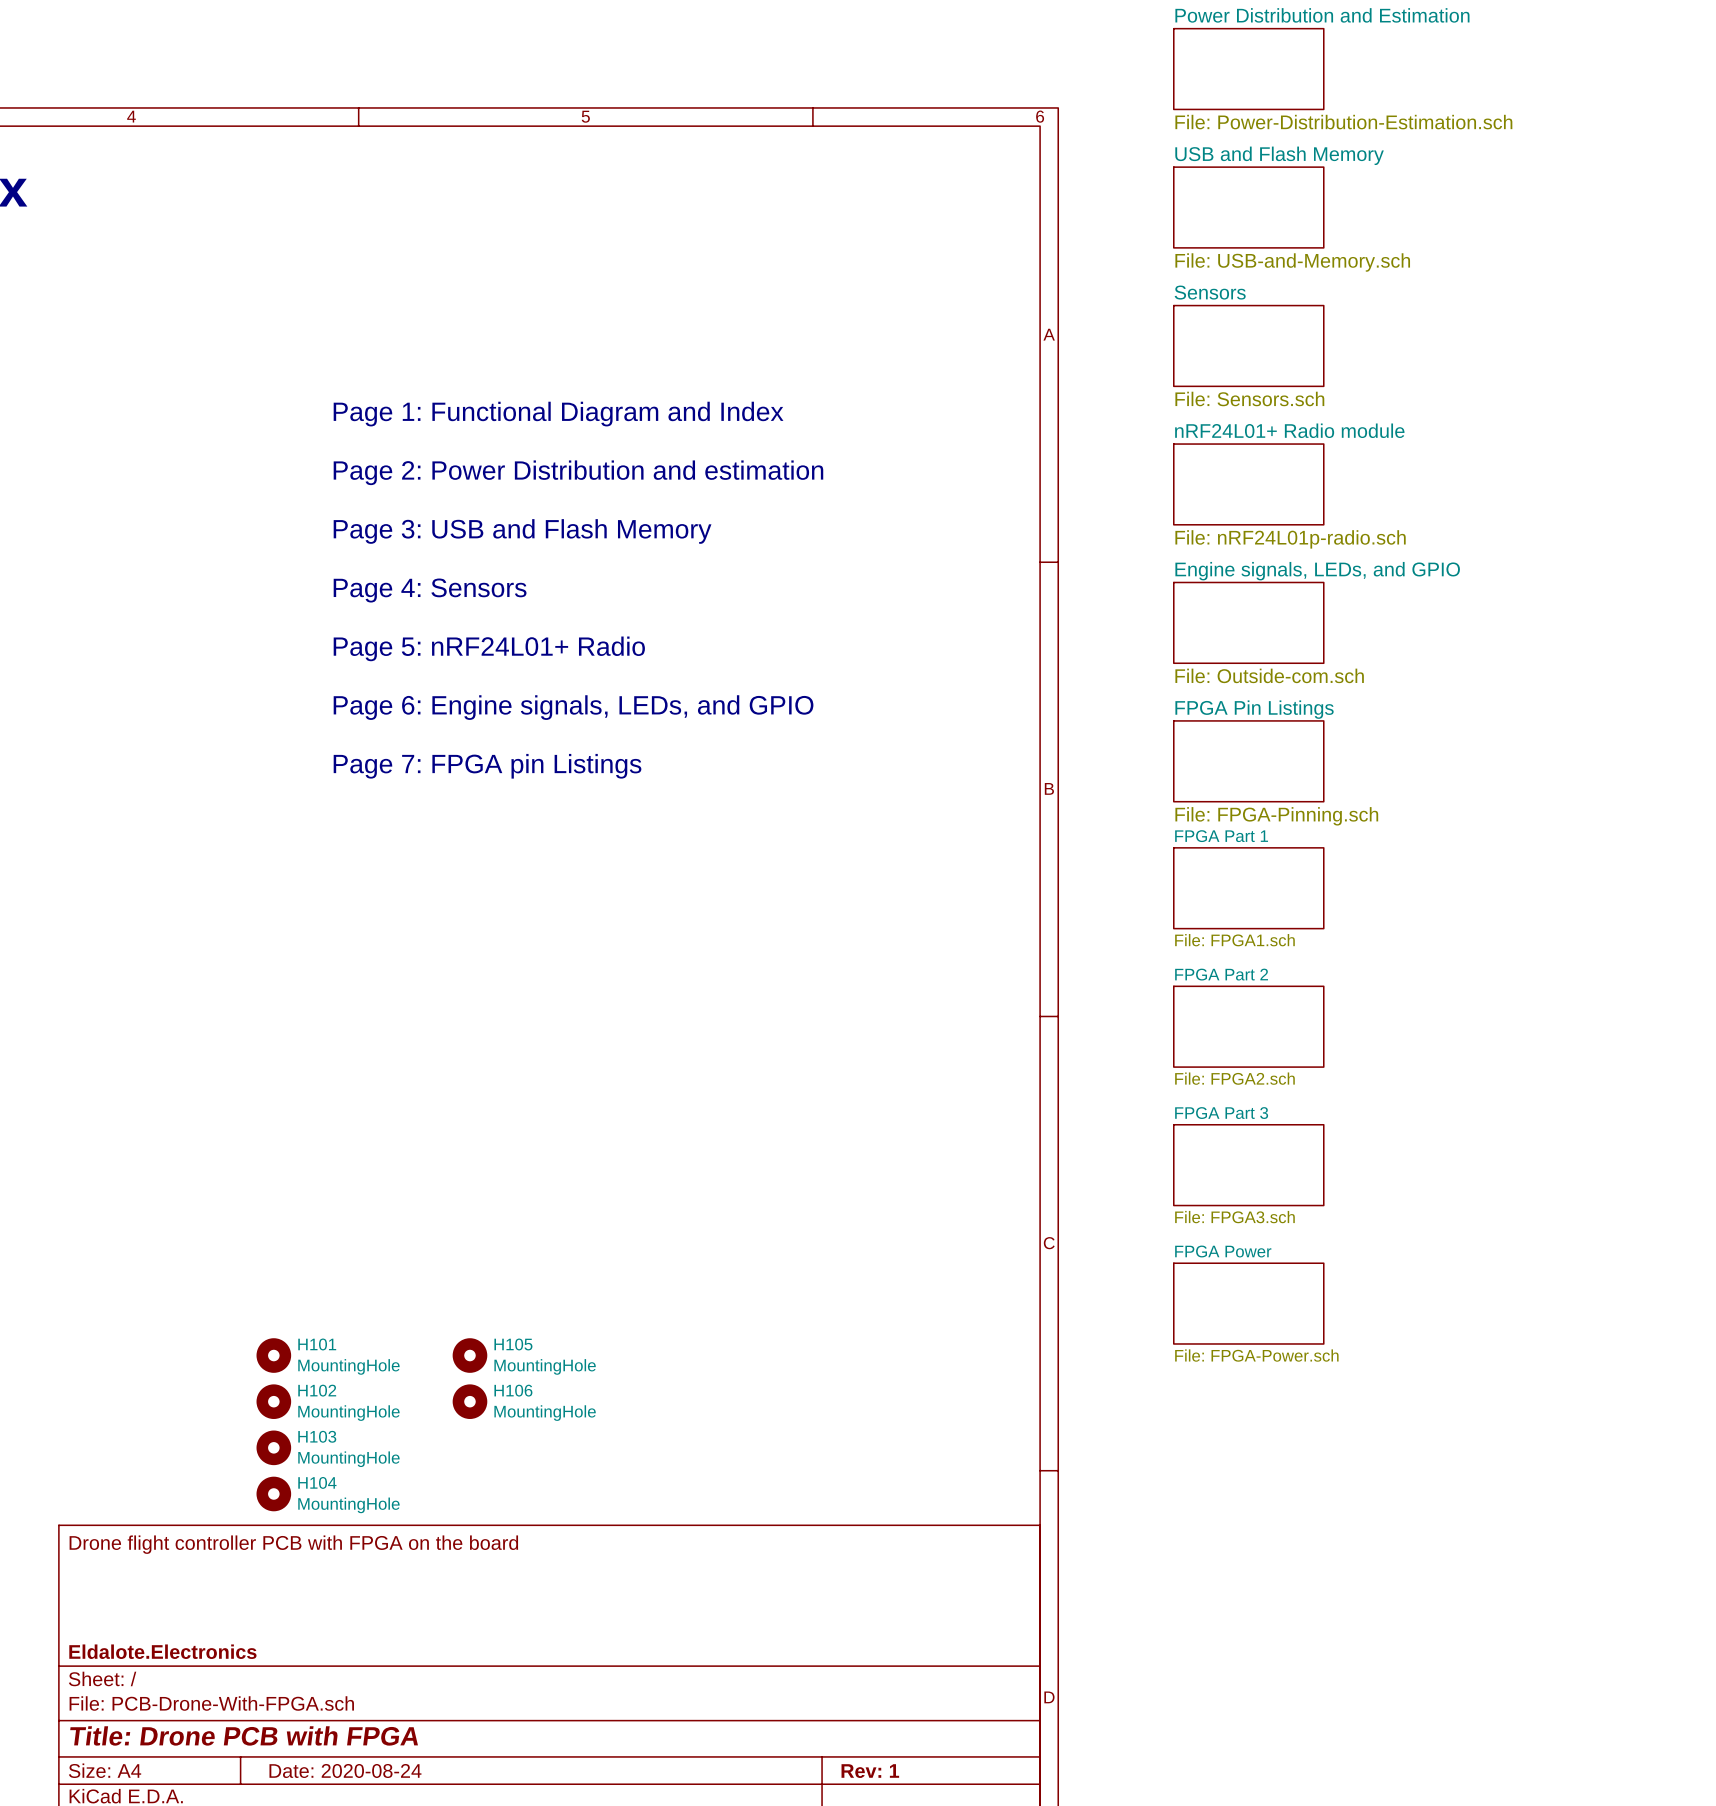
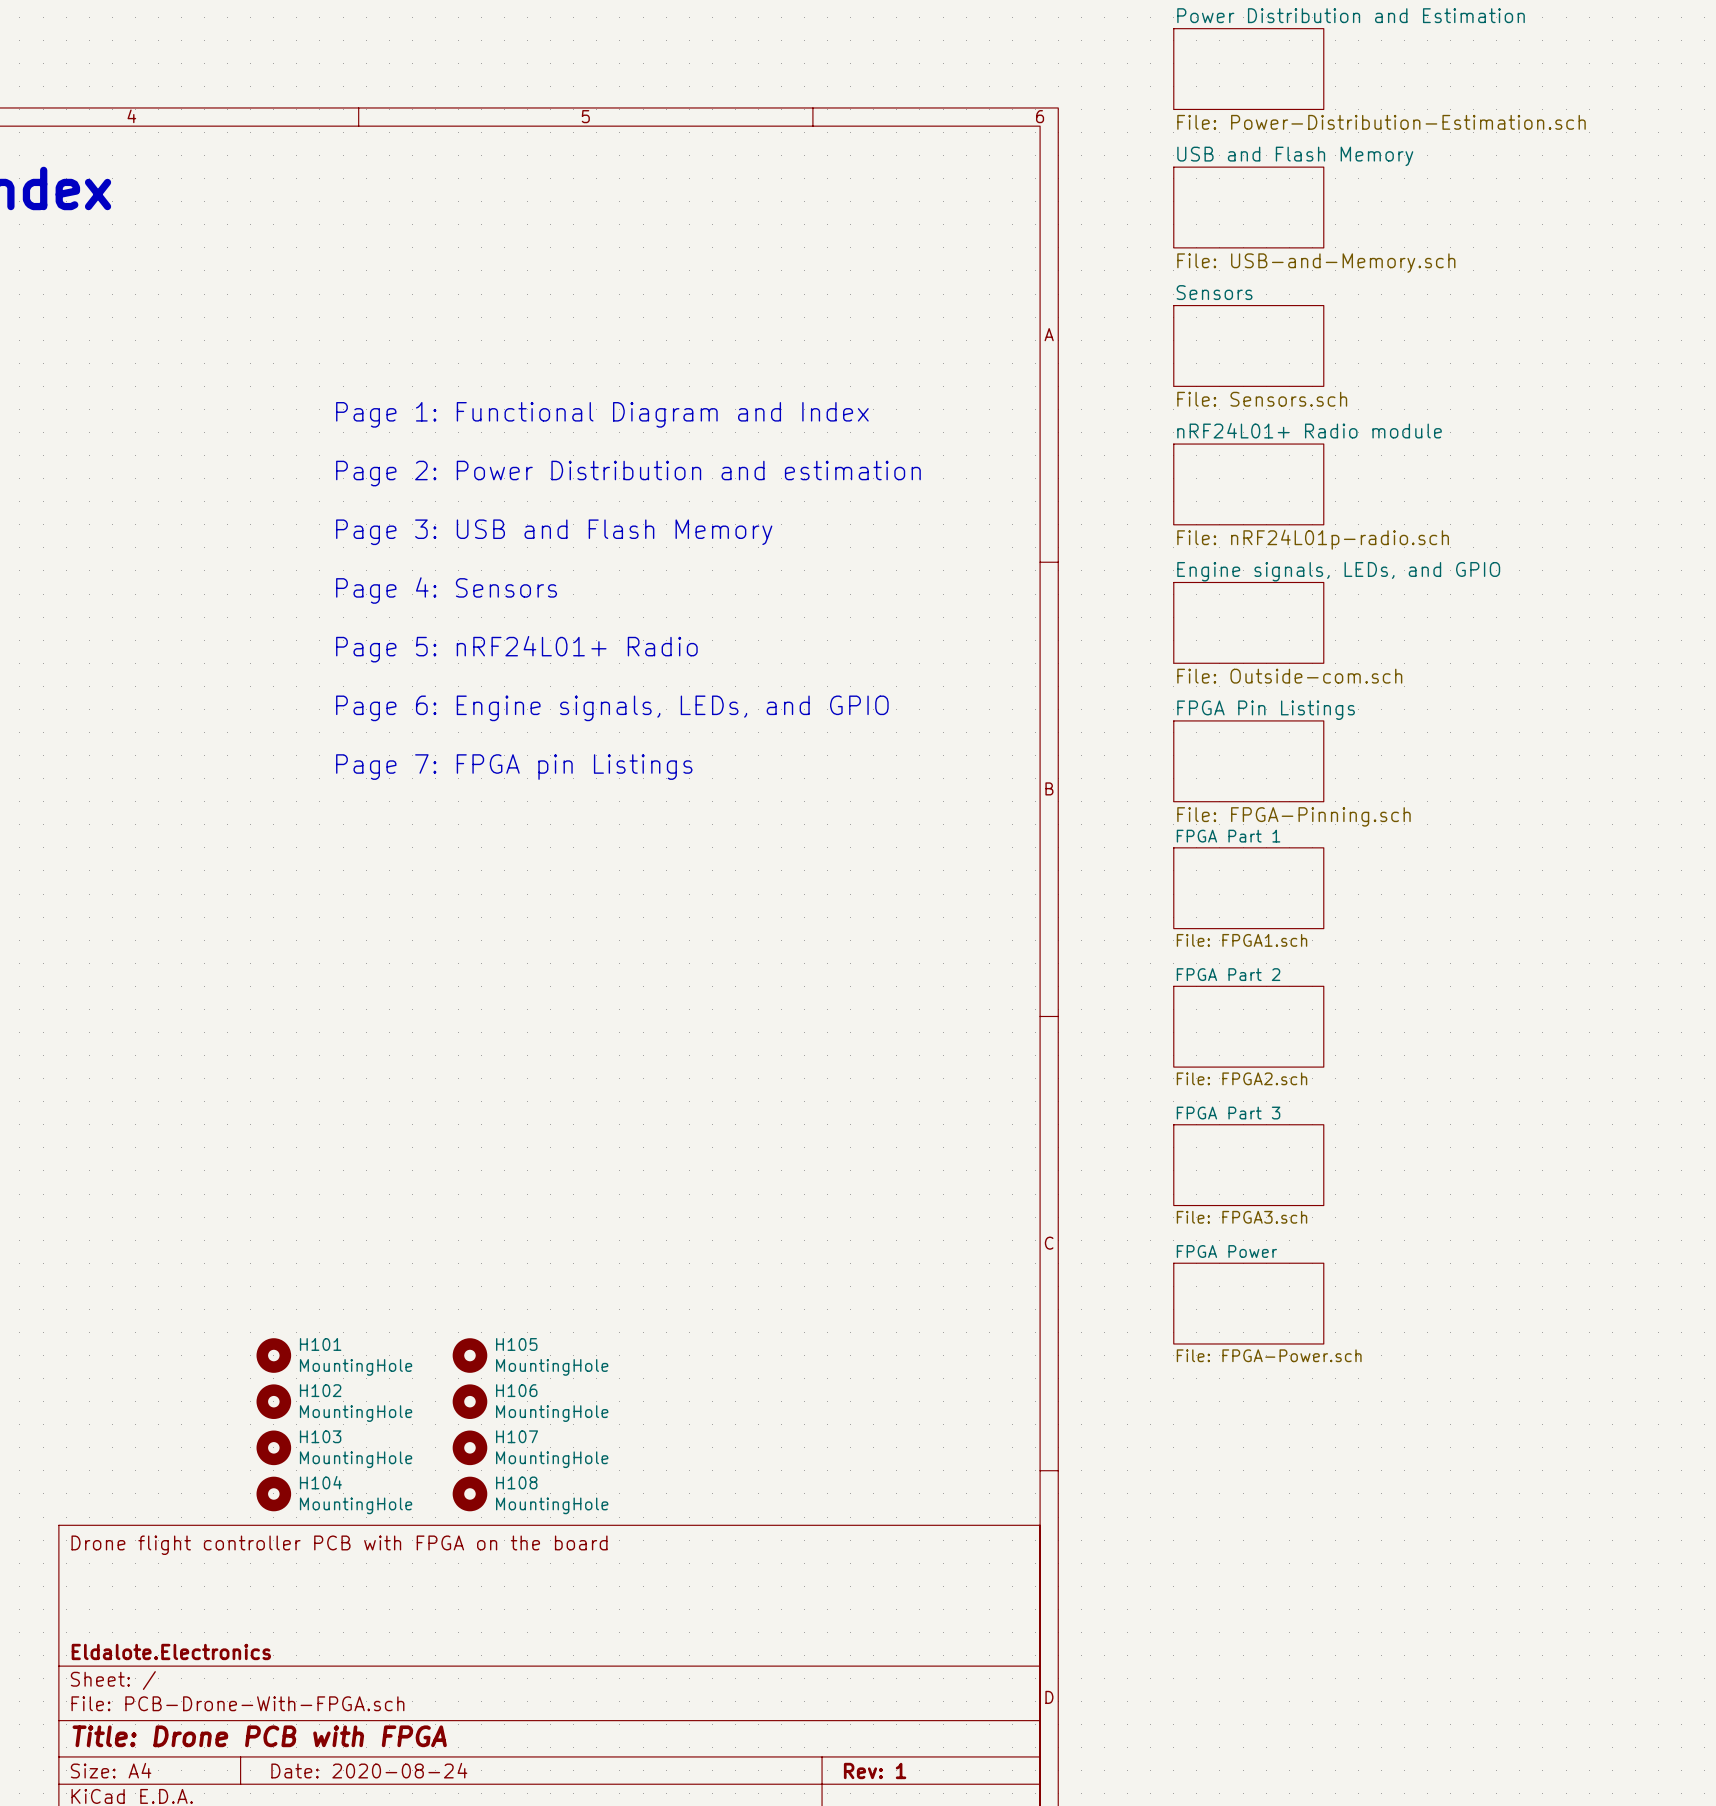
H107: none -> MountingHole (469, 1447)
H108: none -> MountingHole (469, 1493)

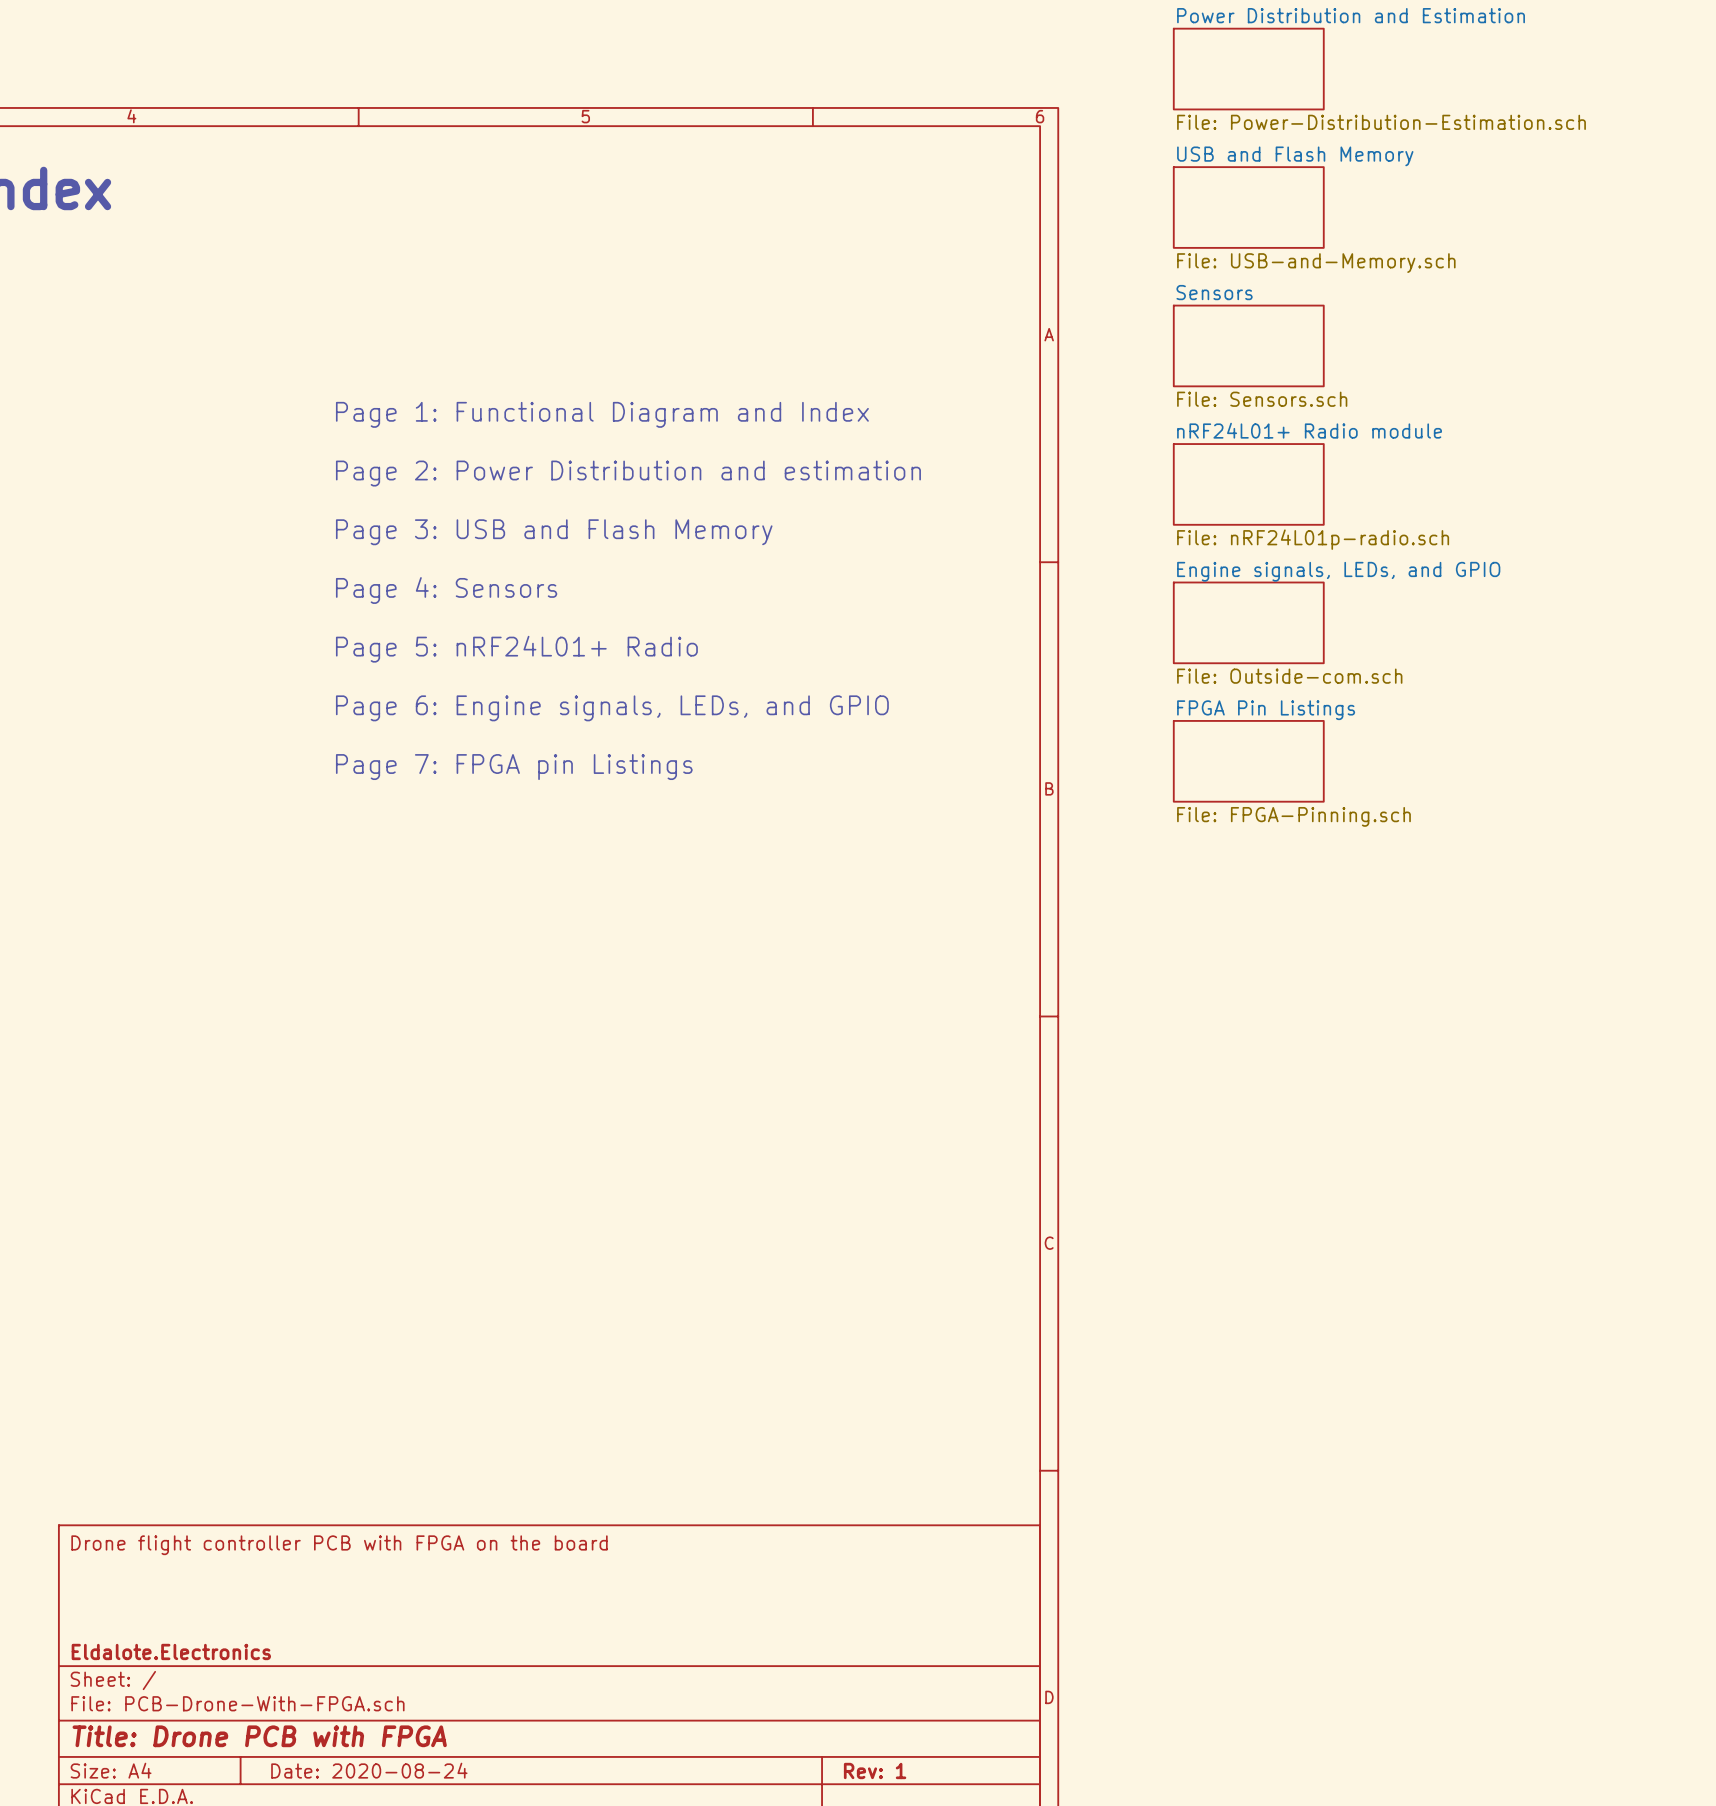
sheet FPGA Part 1: File: FPGA1.sch (1248, 888) -> none
sheet FPGA Part 2: File: FPGA2.sch (1248, 1026) -> none
sheet FPGA Part 3: File: FPGA3.sch (1248, 1165) -> none
sheet FPGA Power: File: FPGA-Power.sch (1248, 1303) -> none
H101: MountingHole (273, 1355) -> none
H105: MountingHole (469, 1355) -> none
H102: MountingHole (273, 1401) -> none
H106: MountingHole (469, 1401) -> none
H103: MountingHole (273, 1447) -> none
H107: MountingHole (469, 1447) -> none
H104: MountingHole (273, 1493) -> none
H108: MountingHole (469, 1493) -> none

